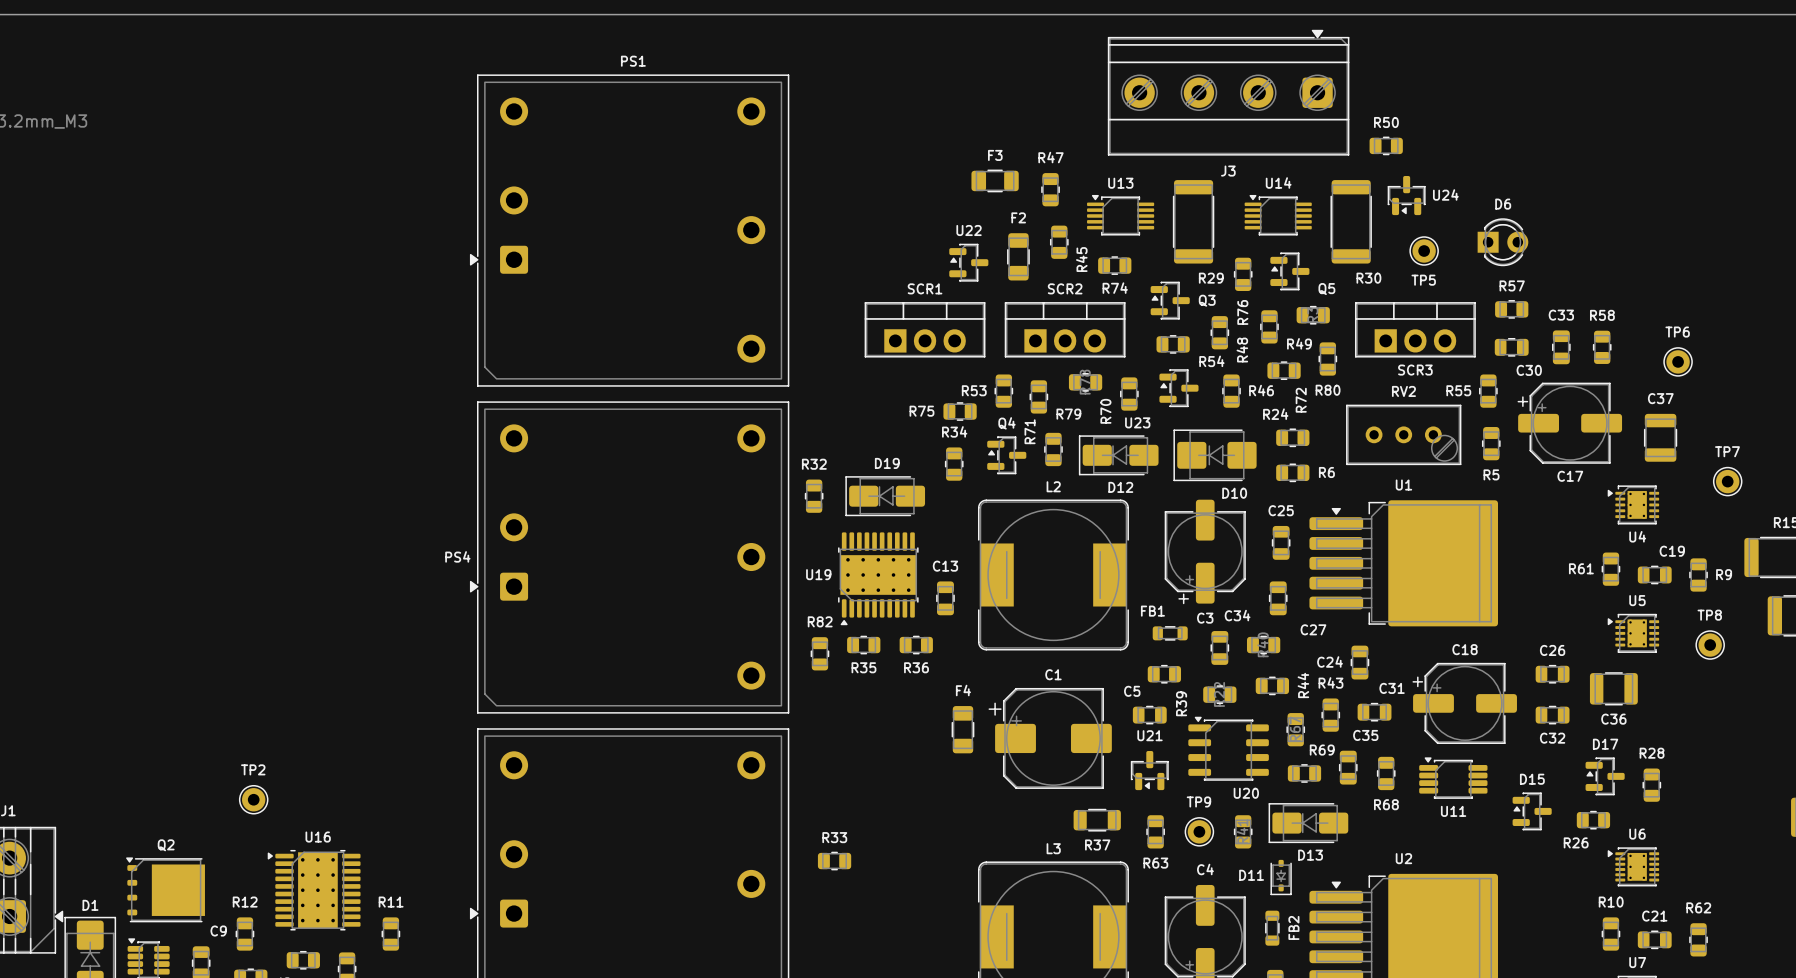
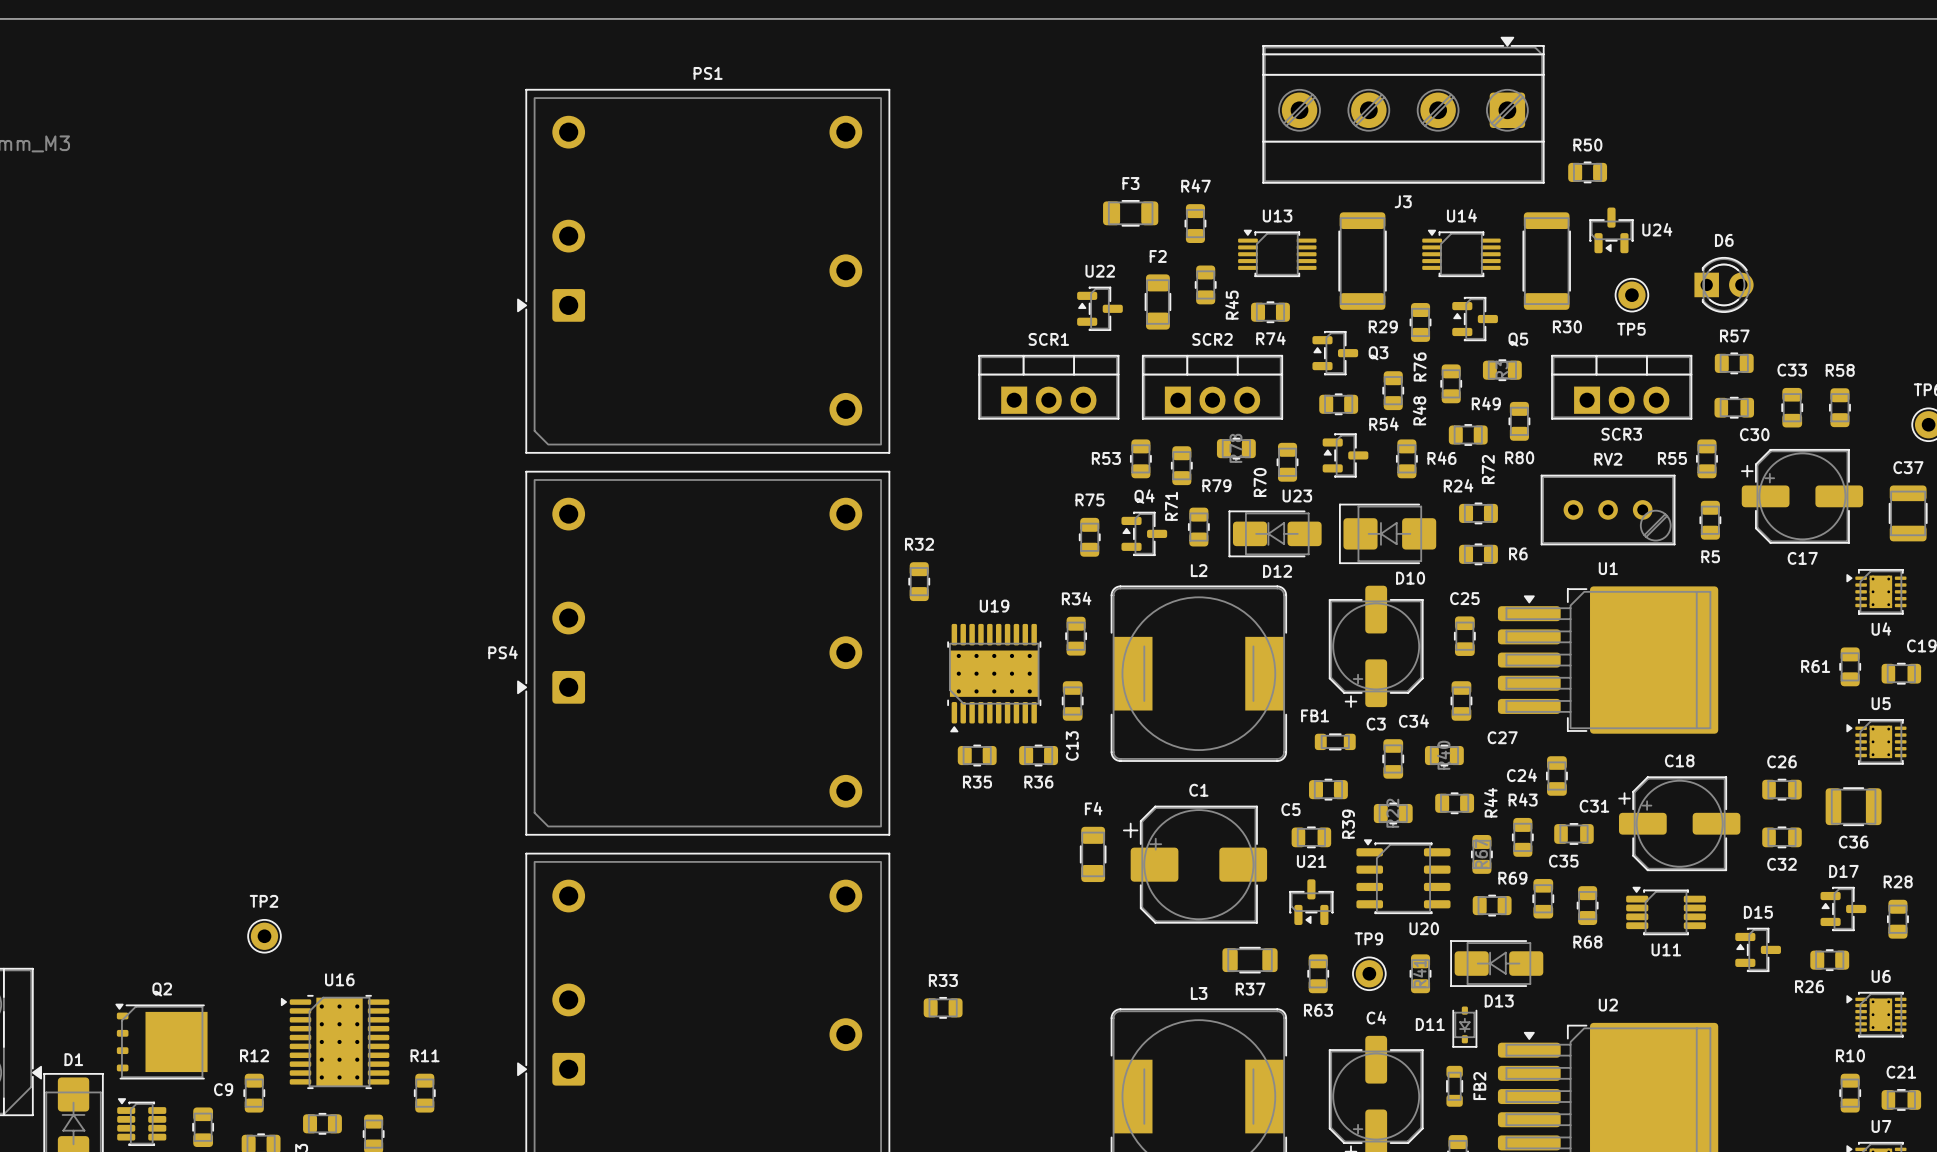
R75 rotation: 0° (960, 411) -> 90° clockwise (1089, 537)
R75 position: (960, 411) -> (1089, 537)
R34 position: (954, 464) -> (1076, 636)
D19: (885, 496) -> none
C13 name rotation: 0° (945, 566) -> 90° counterclockwise (1072, 746)
C13 name position: C13 (945, 566) -> C13 (1072, 746)
U19 name position: U19 (818, 574) -> U19 (994, 606)
R82: (819, 653) -> none

